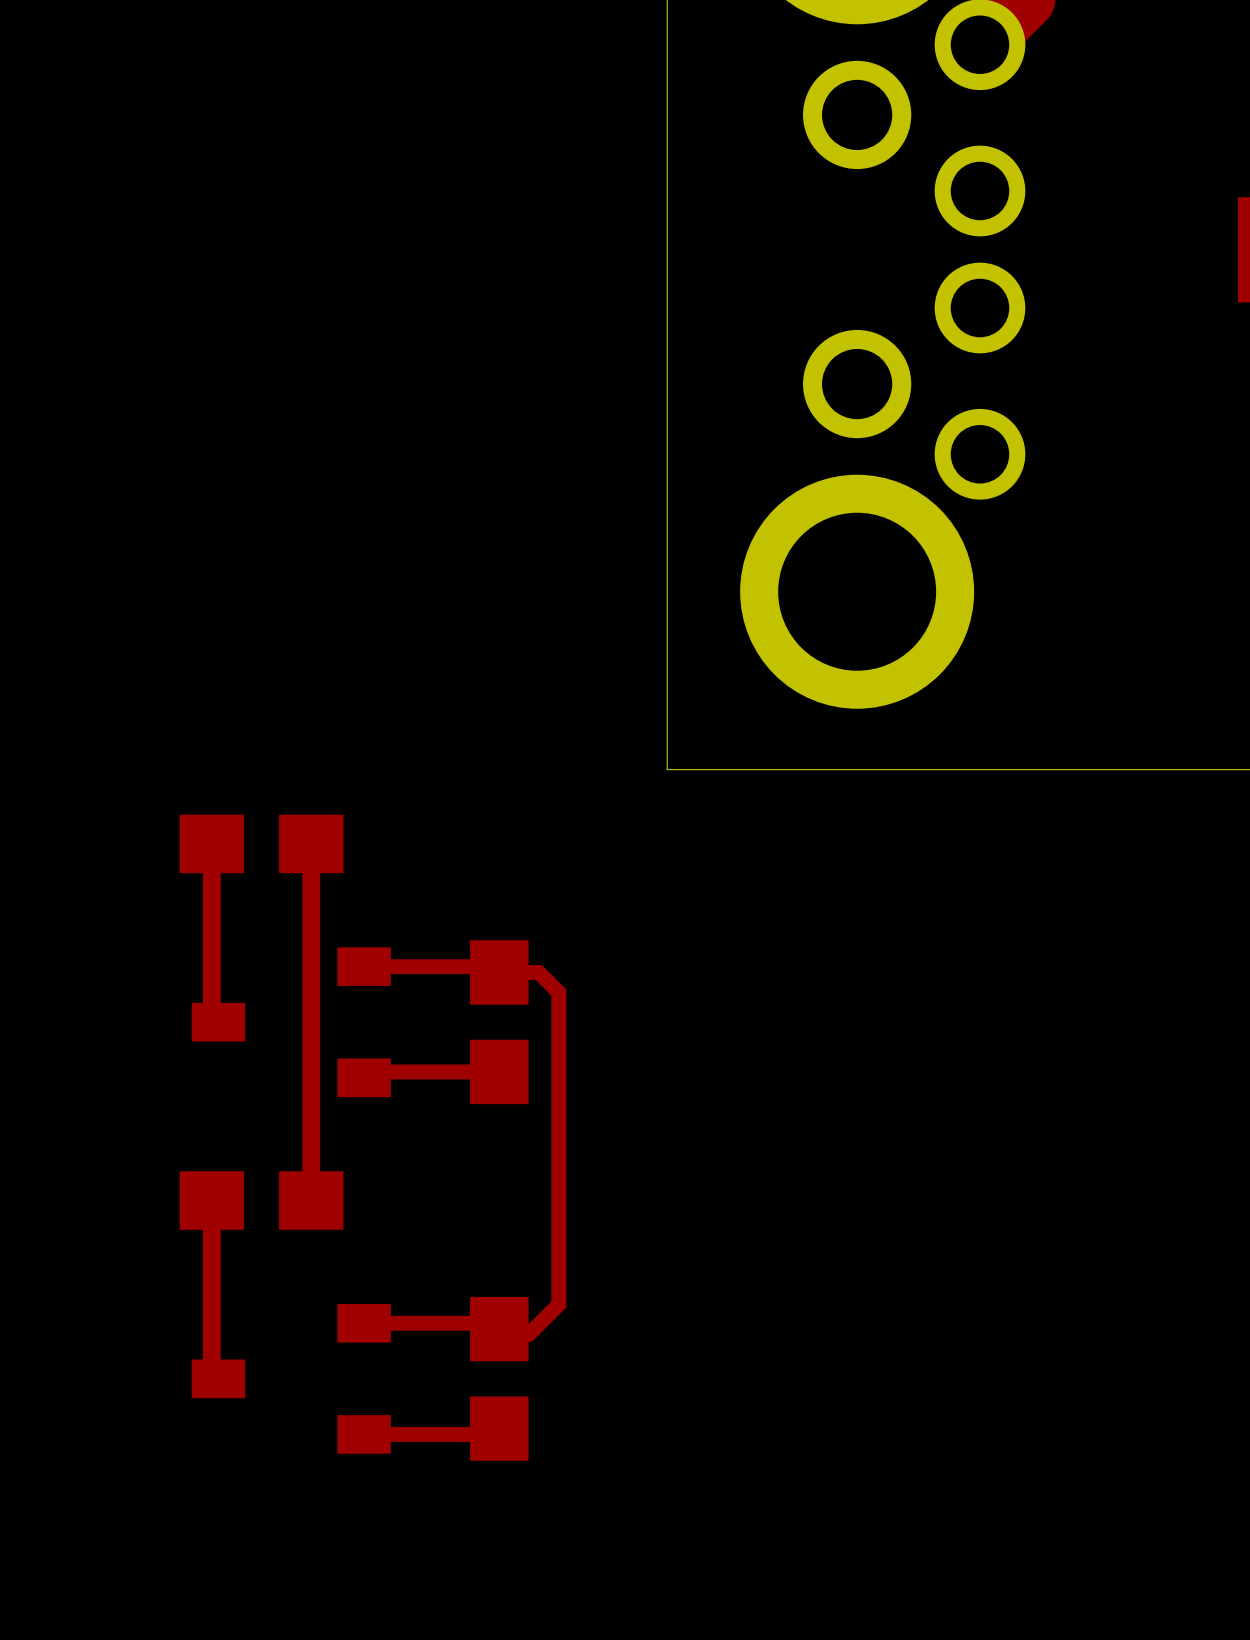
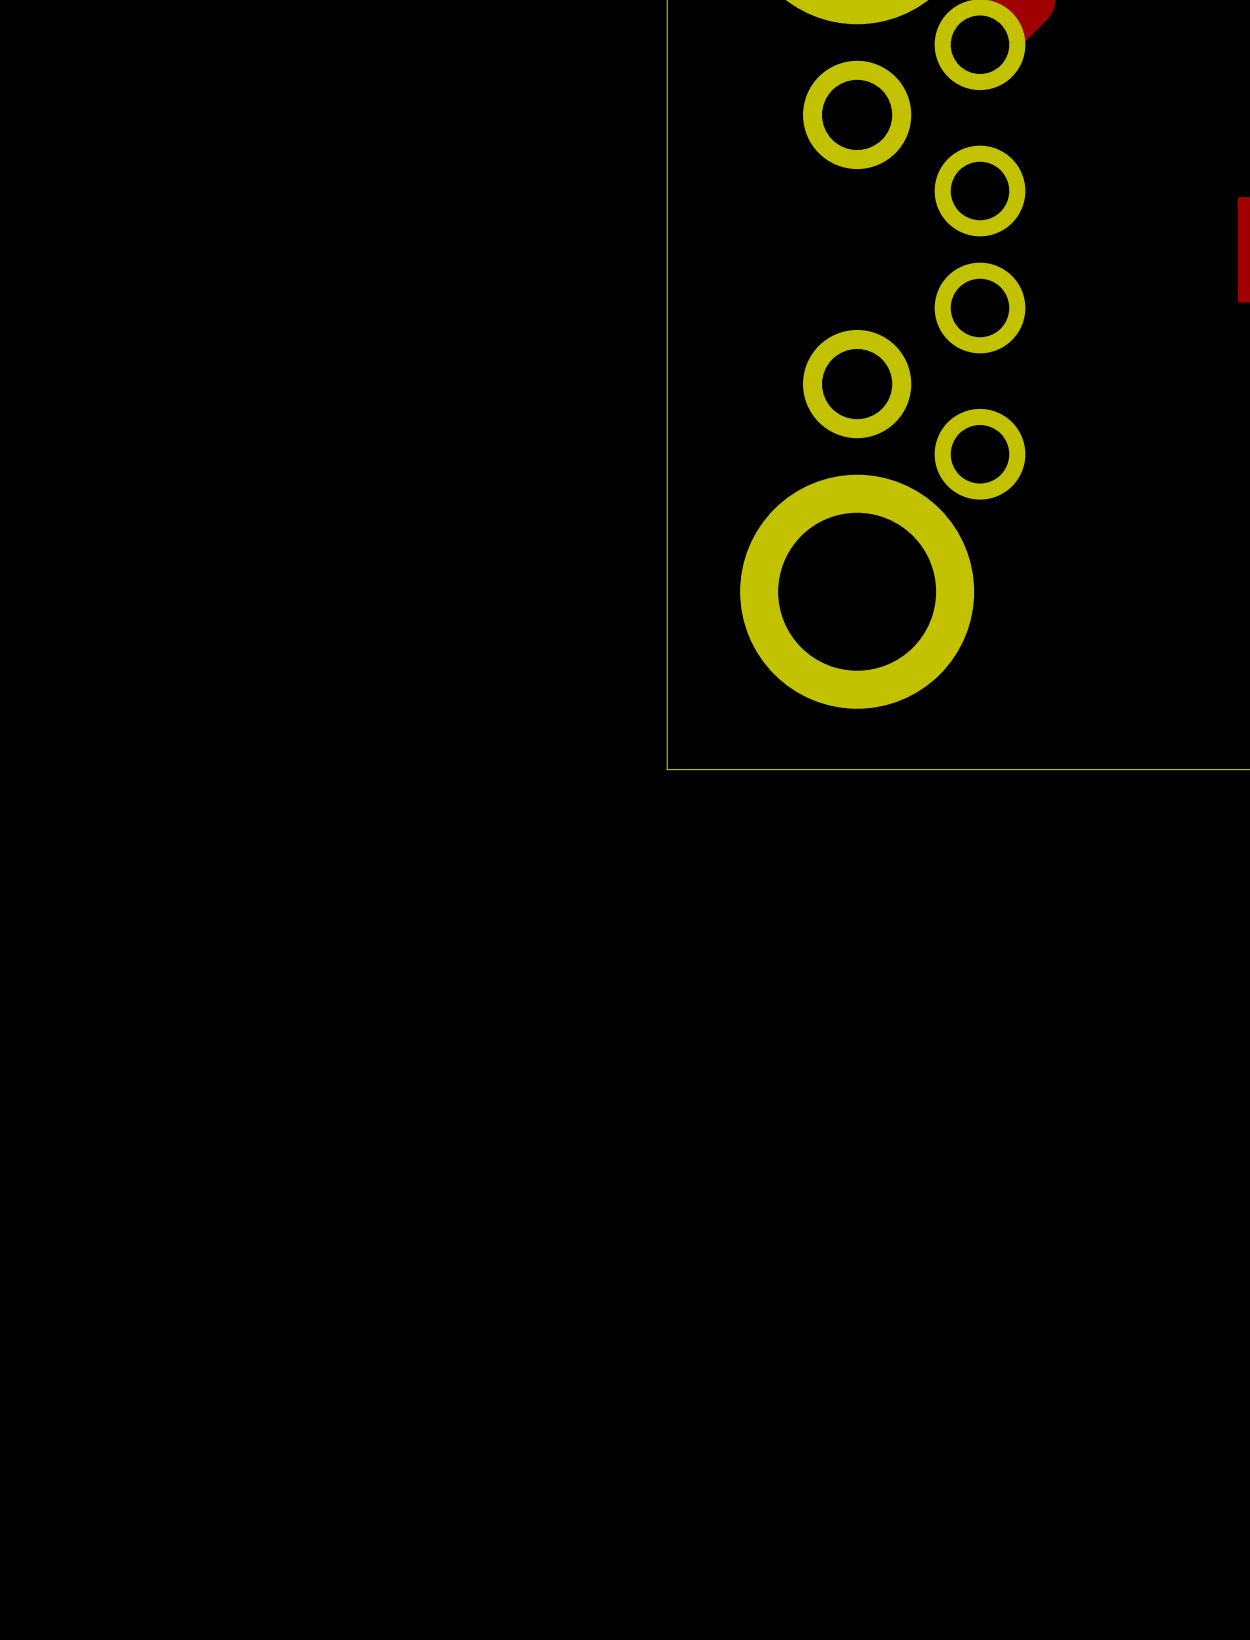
top track: (211, 843) (211, 1015) (218, 1022) -> none
part: (261, 843) -> none
top track: (311, 843) (311, 1200) -> none
top track: (364, 966) (493, 966) (499, 972) (538, 972) (558, 992) (558, 1304) (529, 1334) (523, 1329) (499, 1329) (493, 1323) (364, 1323) -> none
part: (291, 1022) -> none
part: (499, 1022) -> none
top track: (499, 1071) (369, 1071) (364, 1077) -> none
top track: (211, 1200) (211, 1372) (218, 1378) -> none
part: (261, 1200) -> none
part: (291, 1378) -> none
part: (499, 1378) -> none
top track: (499, 1428) (493, 1434) (364, 1434) -> none

